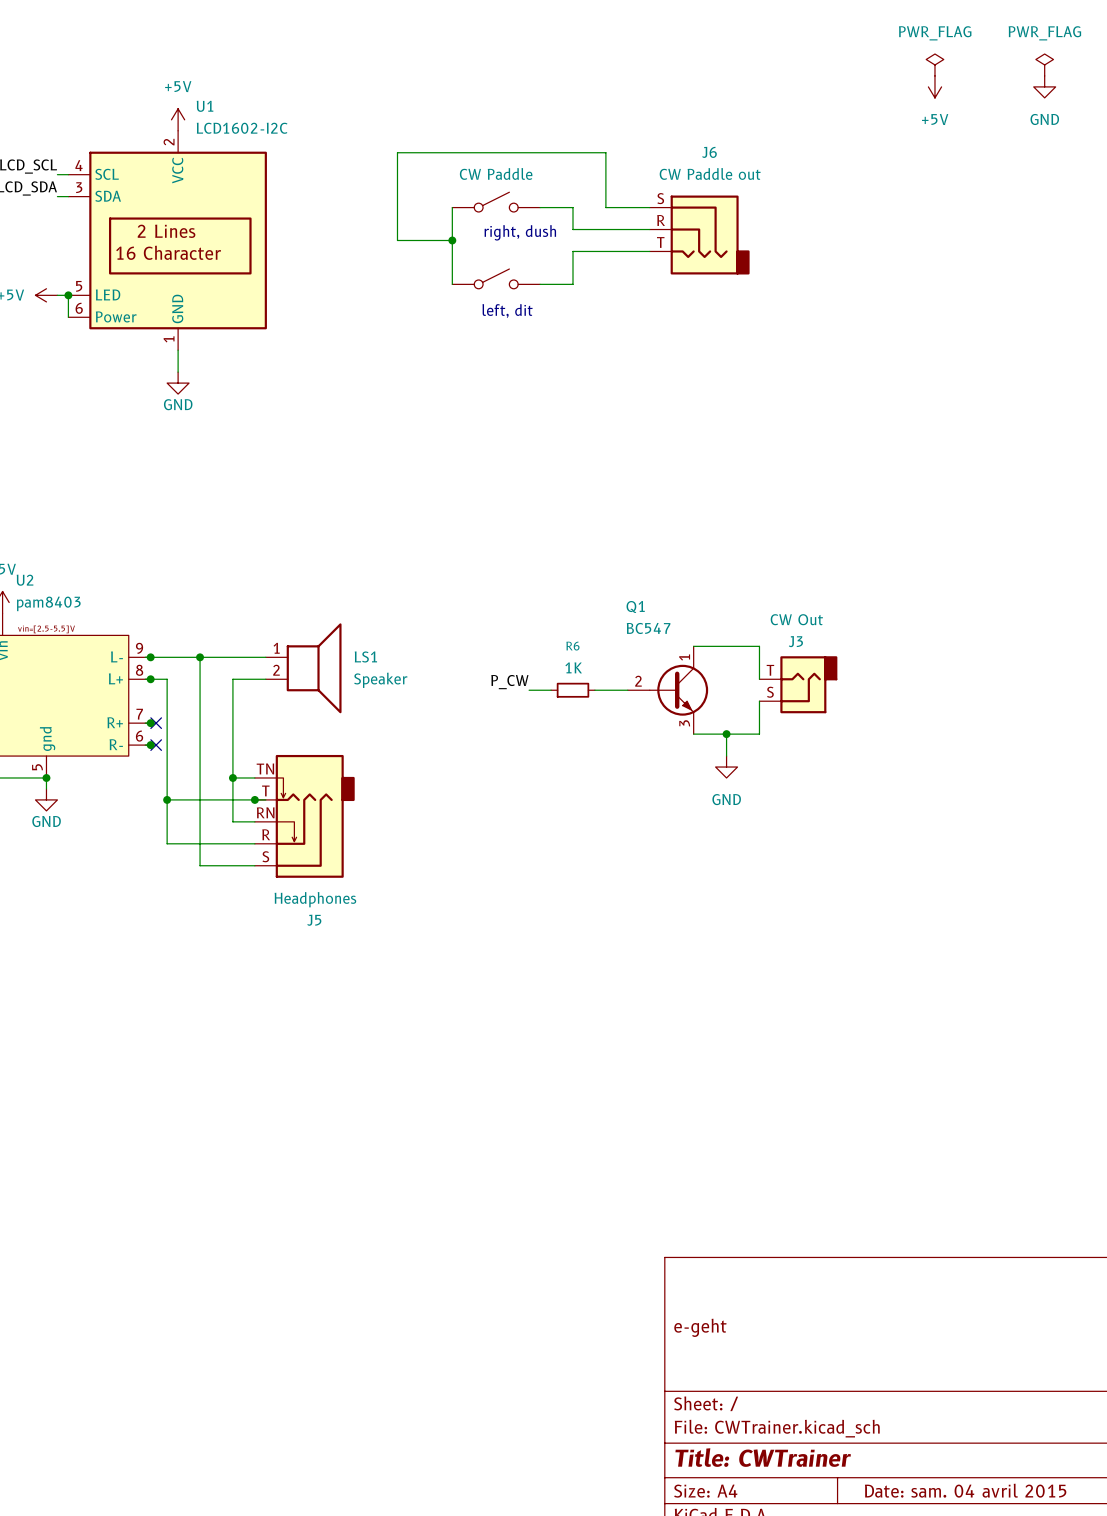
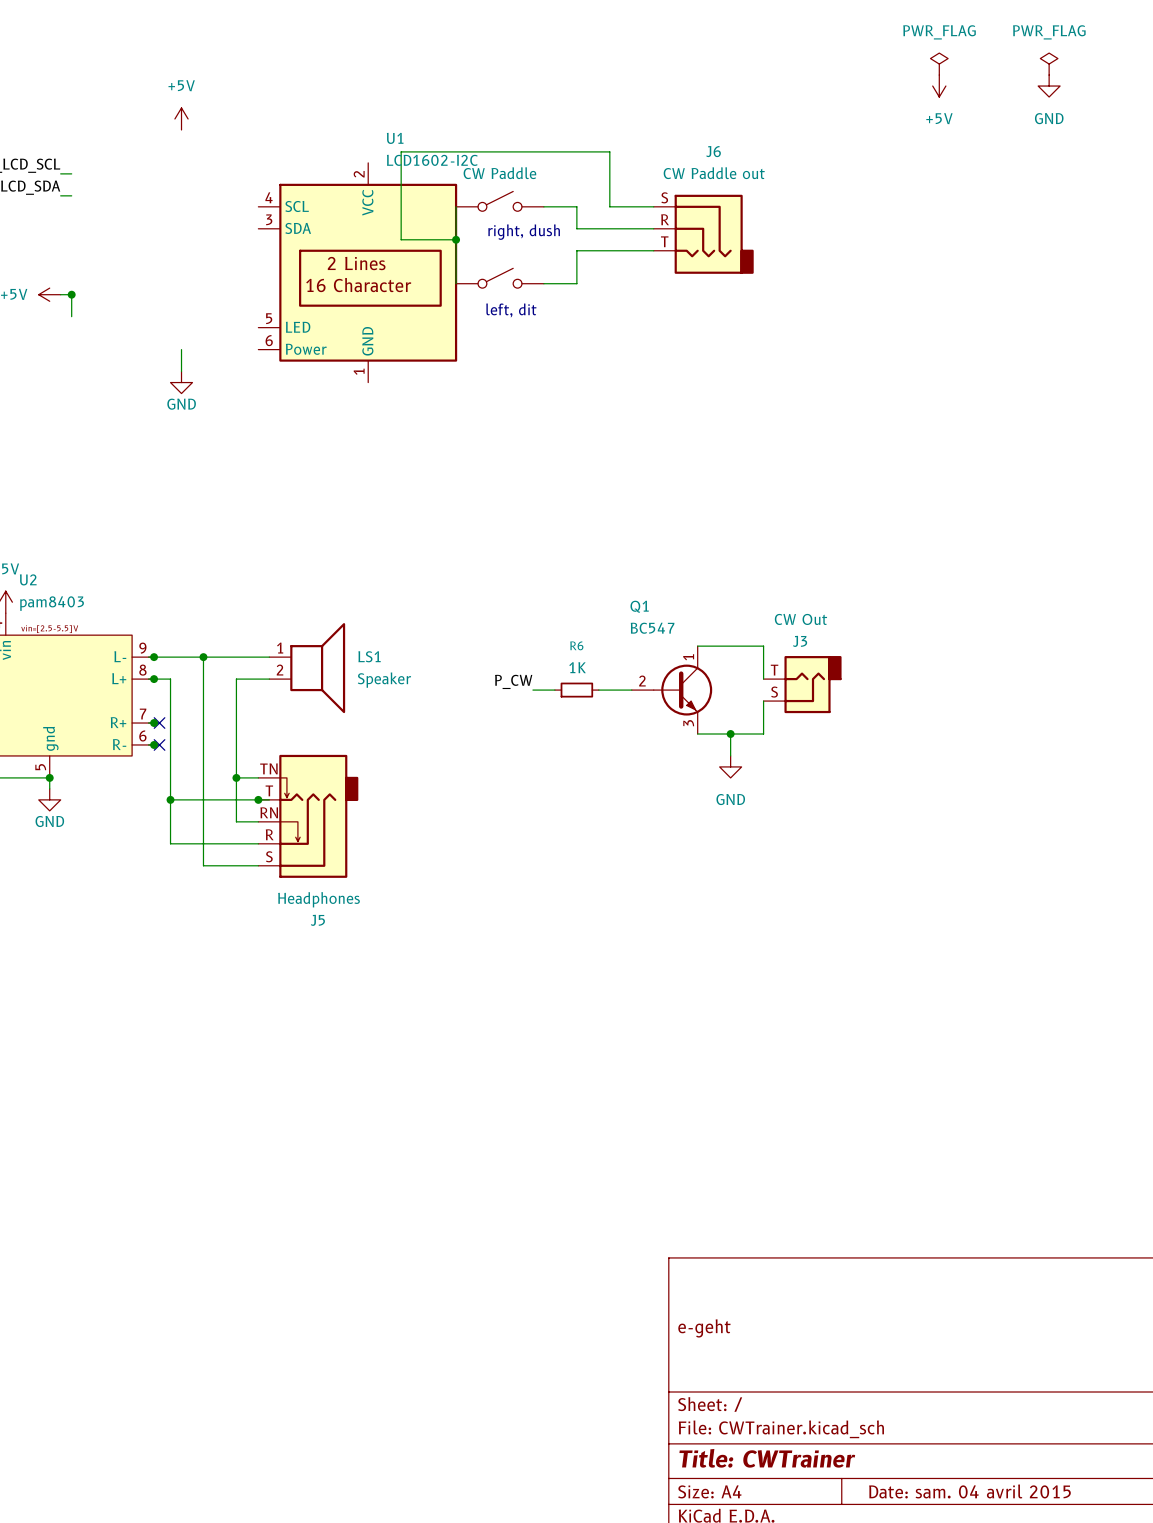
U1 position: (167, 240) -> (357, 272)

